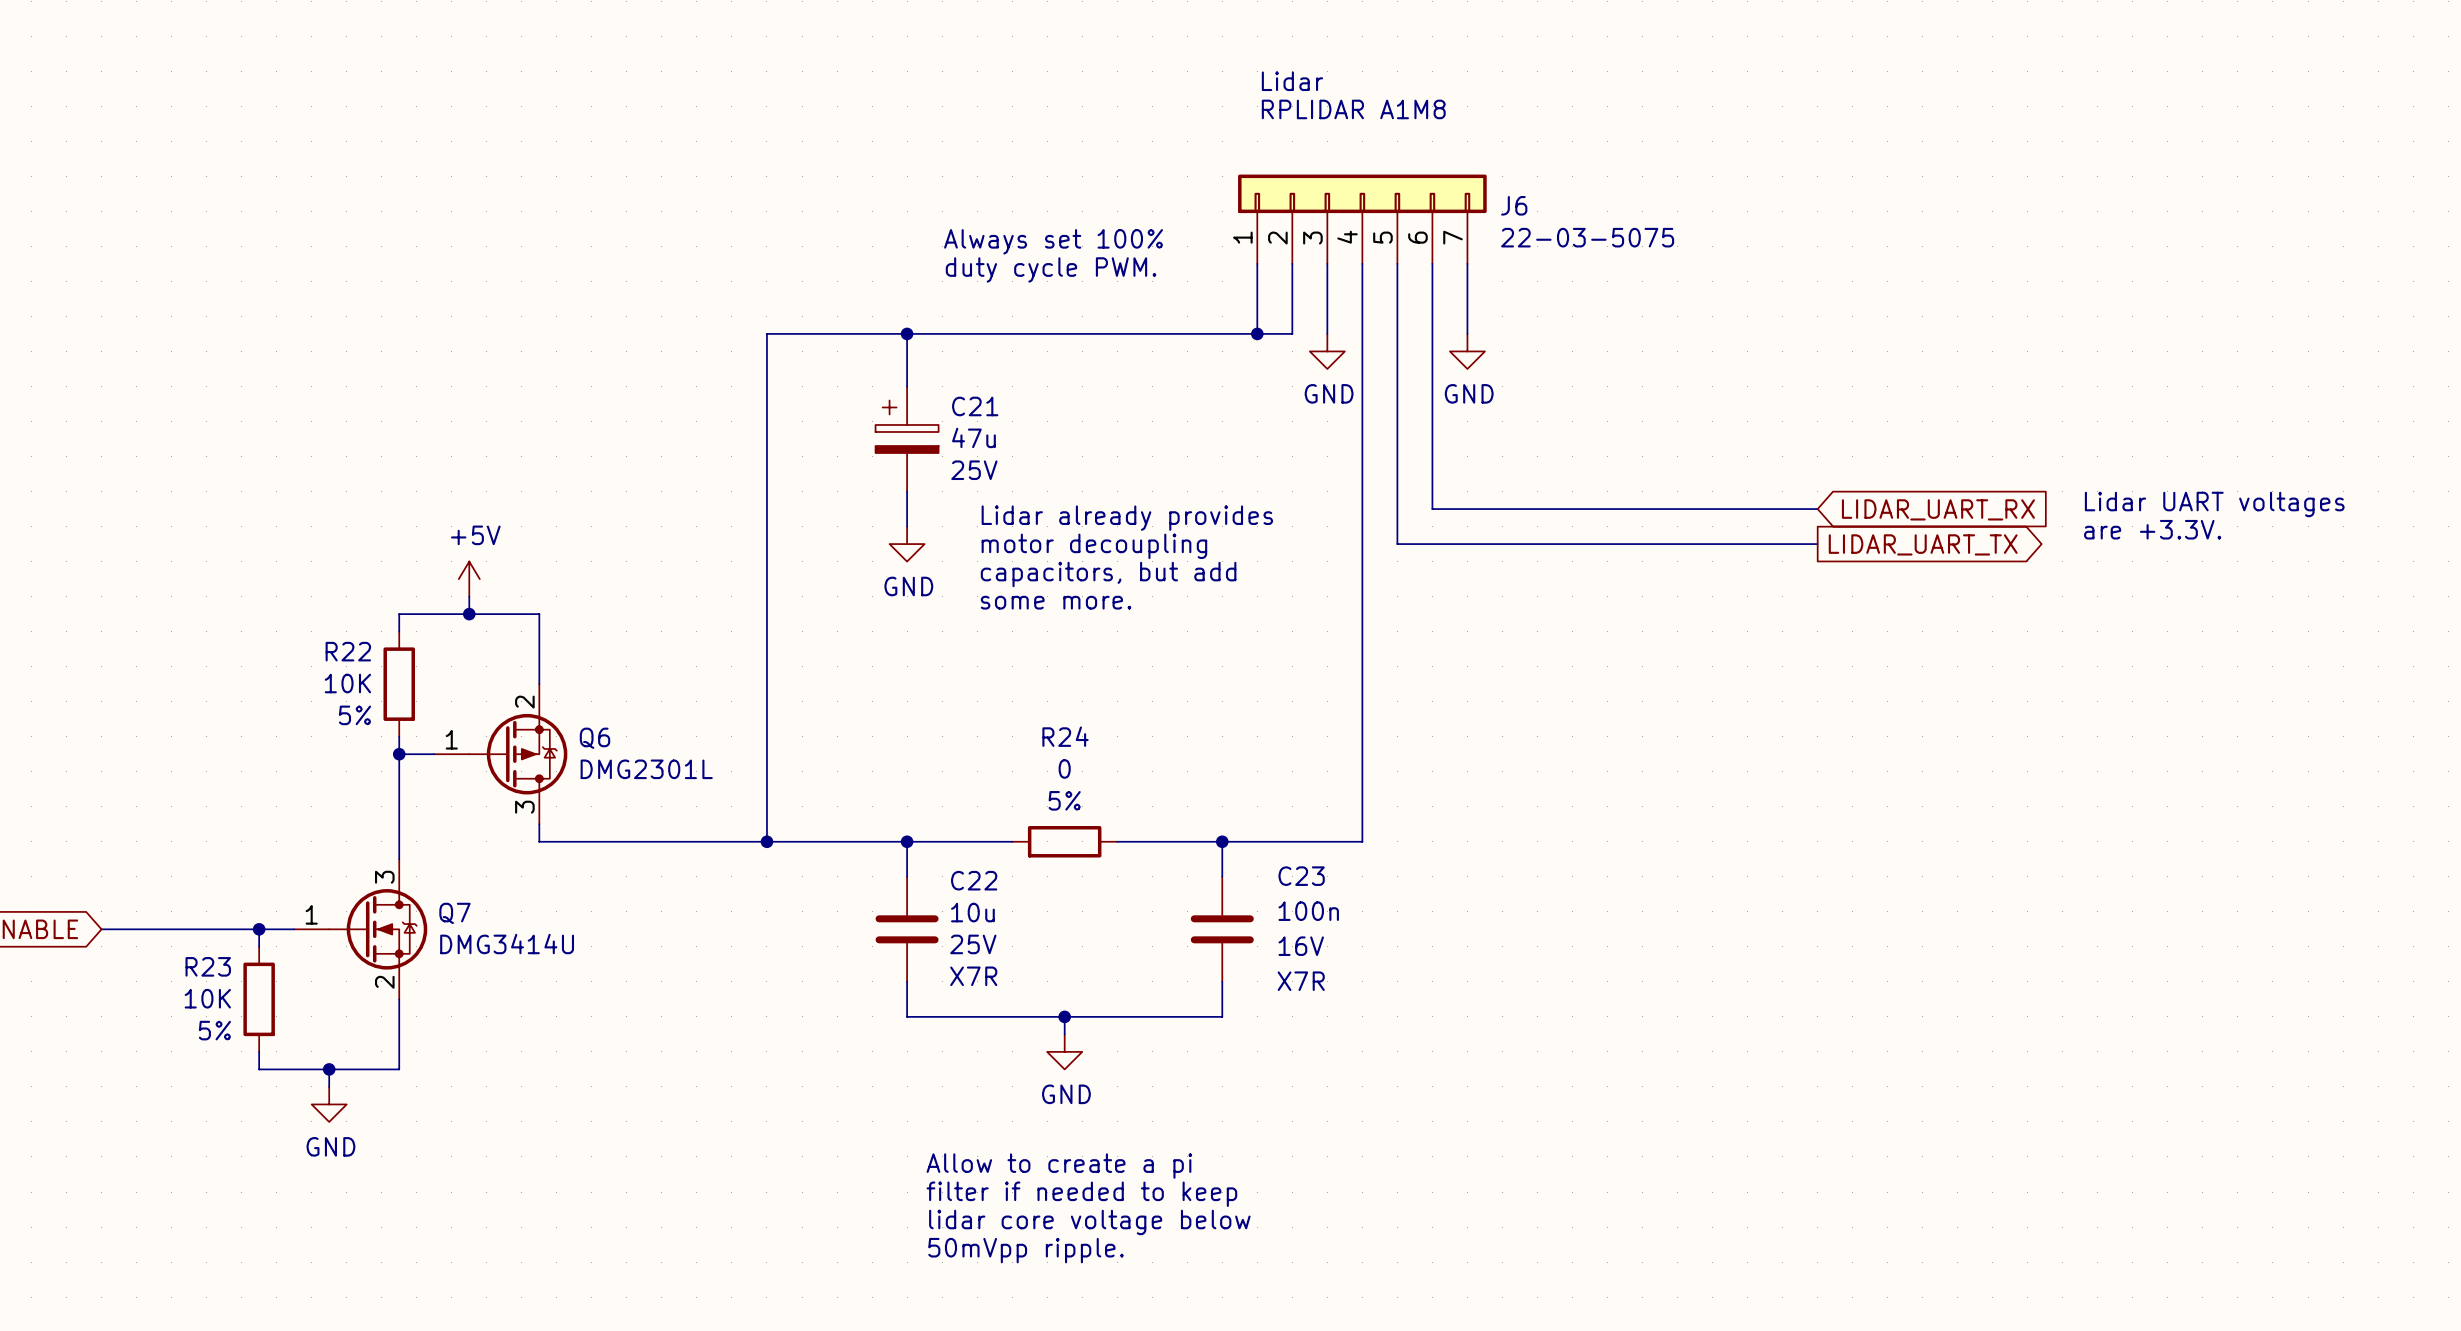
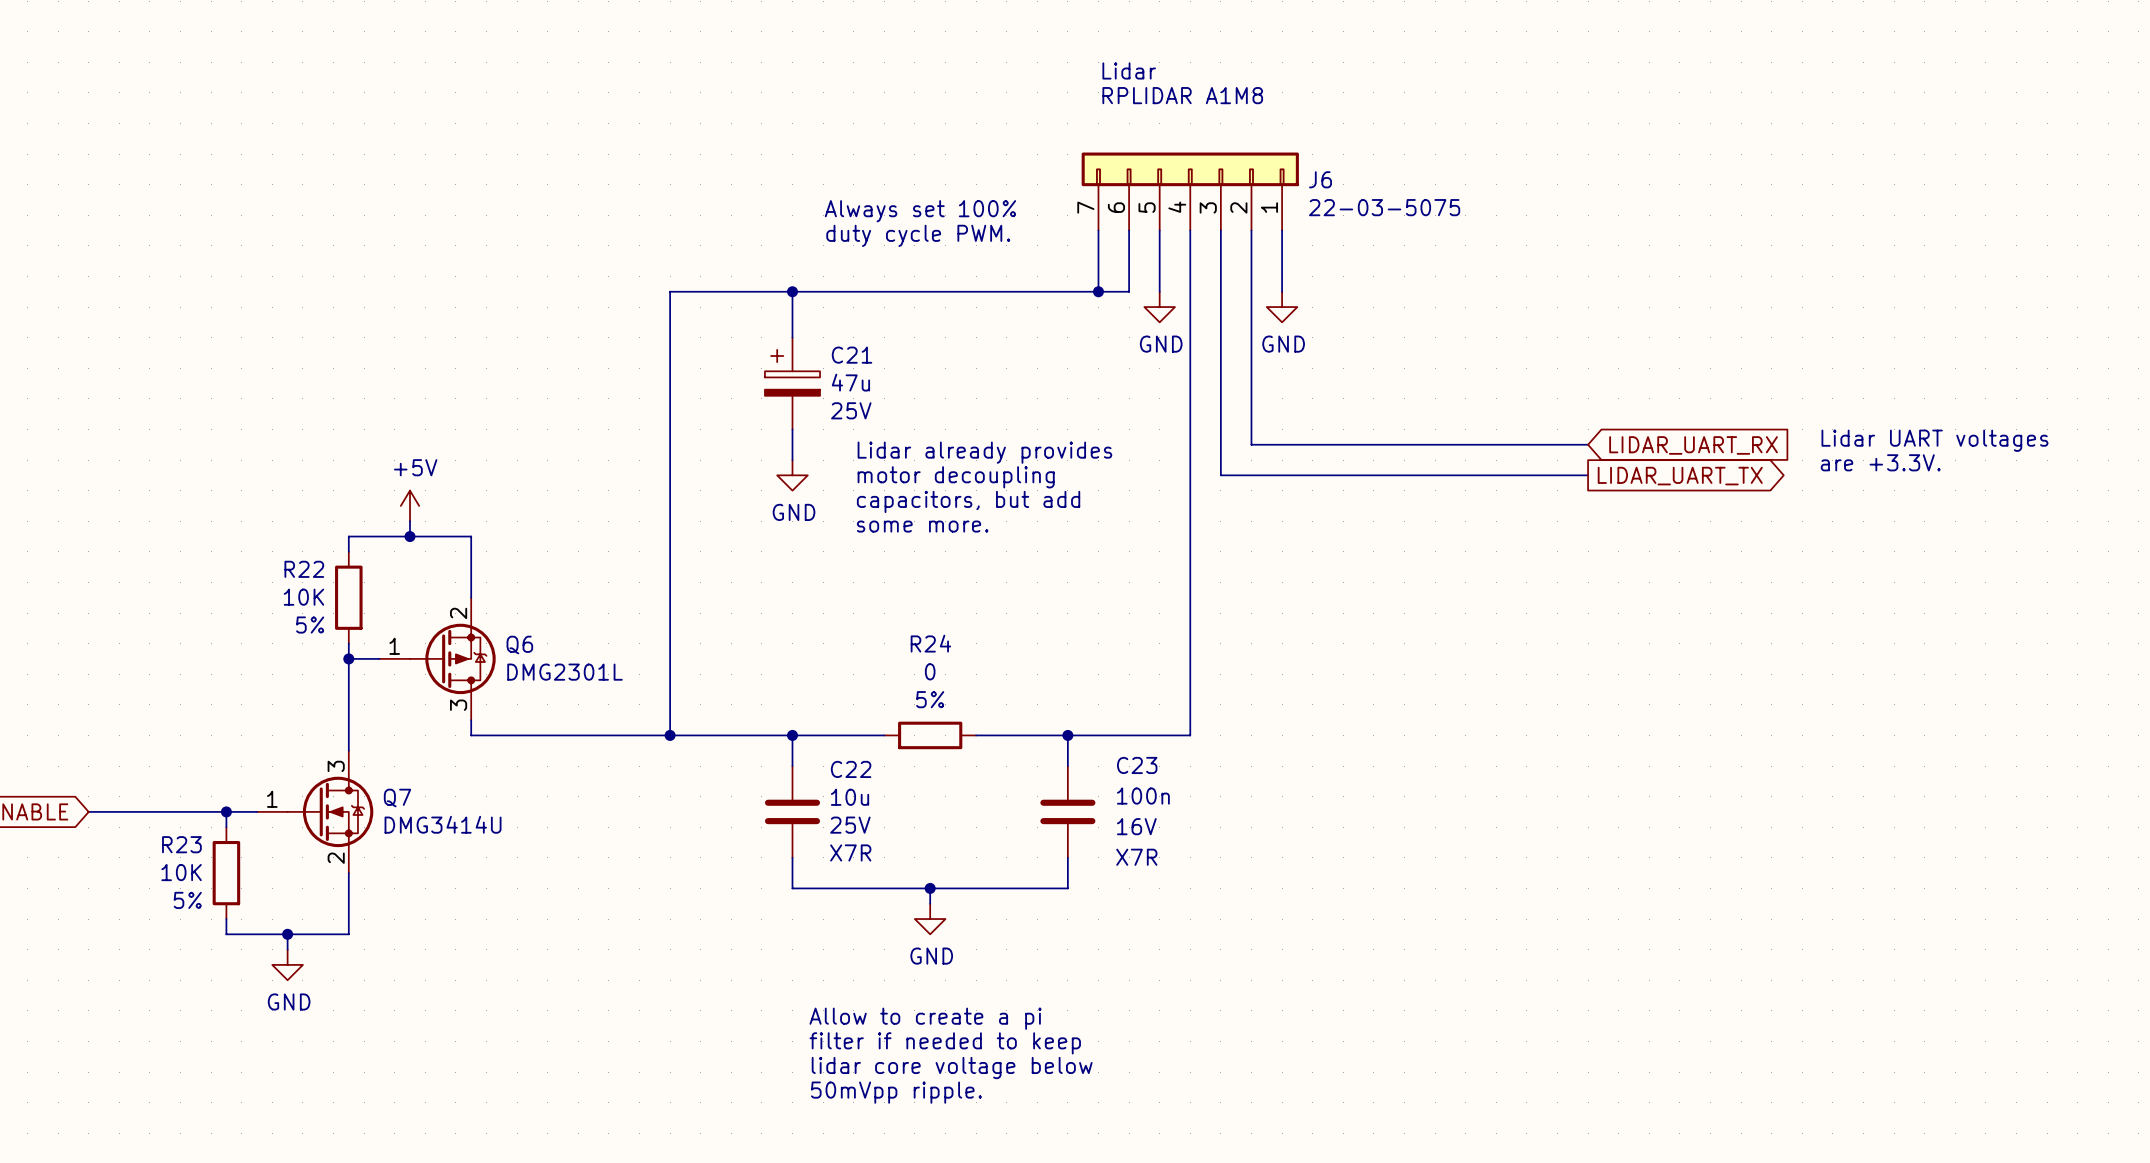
J6 flip: as is (1362, 193) -> left-right (1190, 169)

